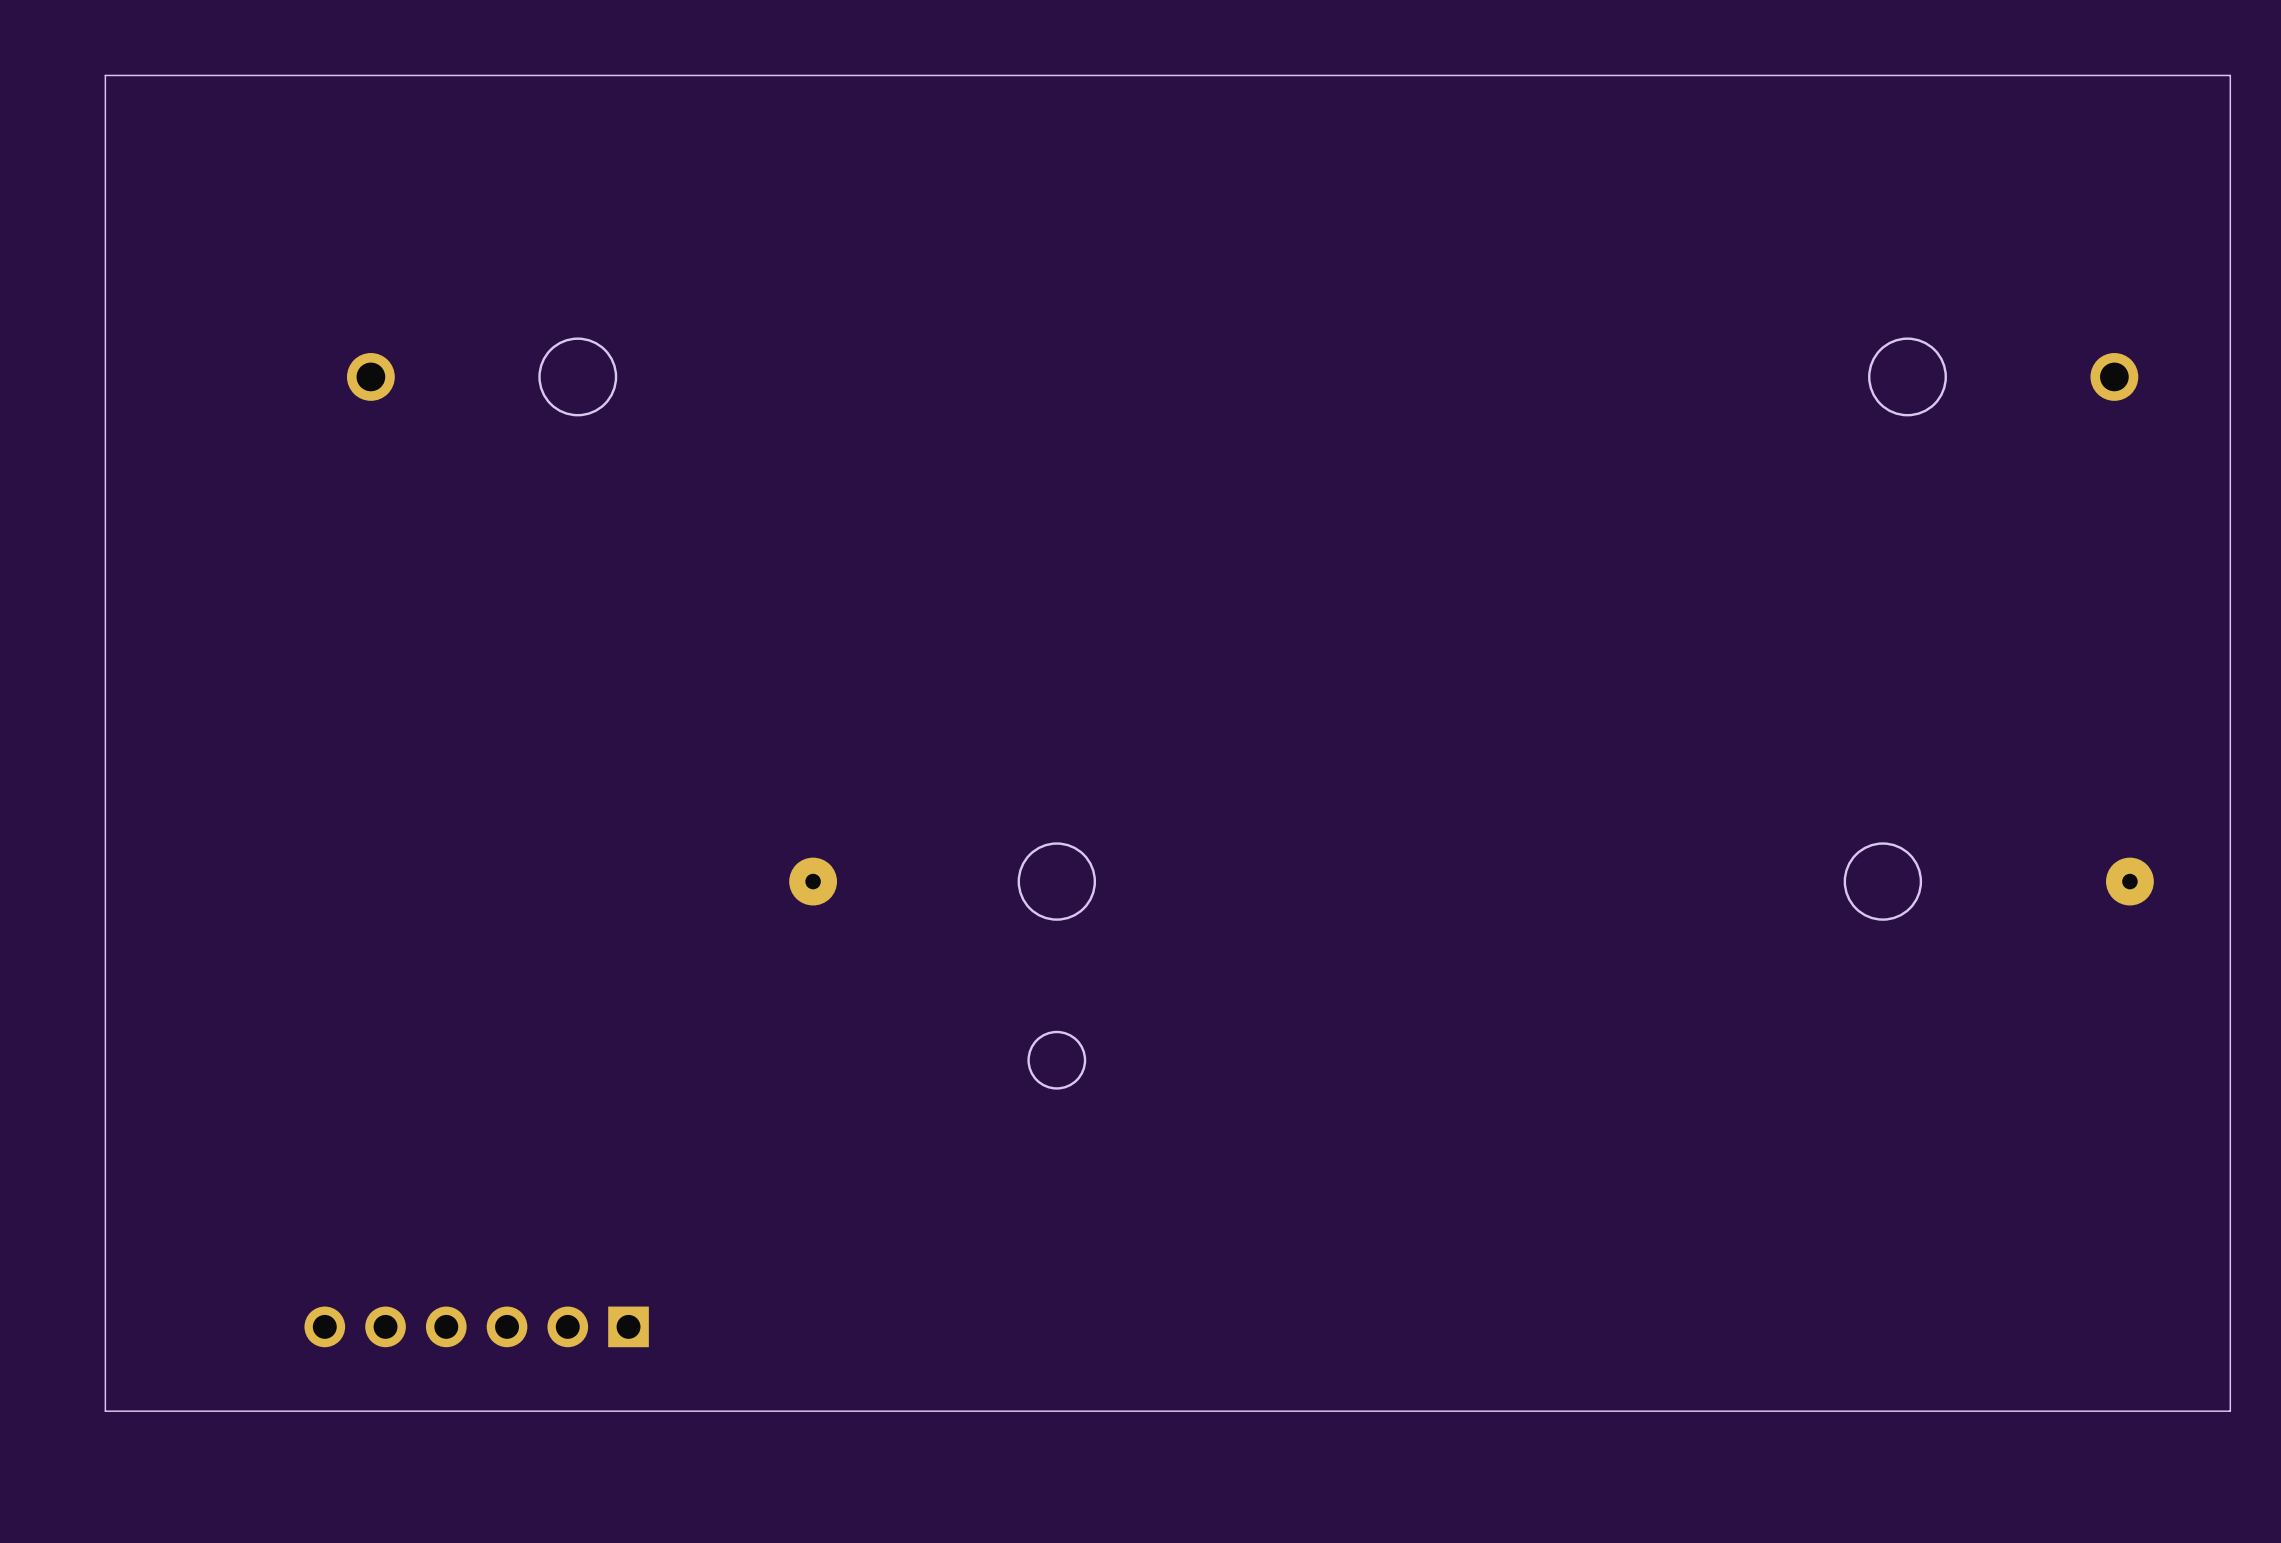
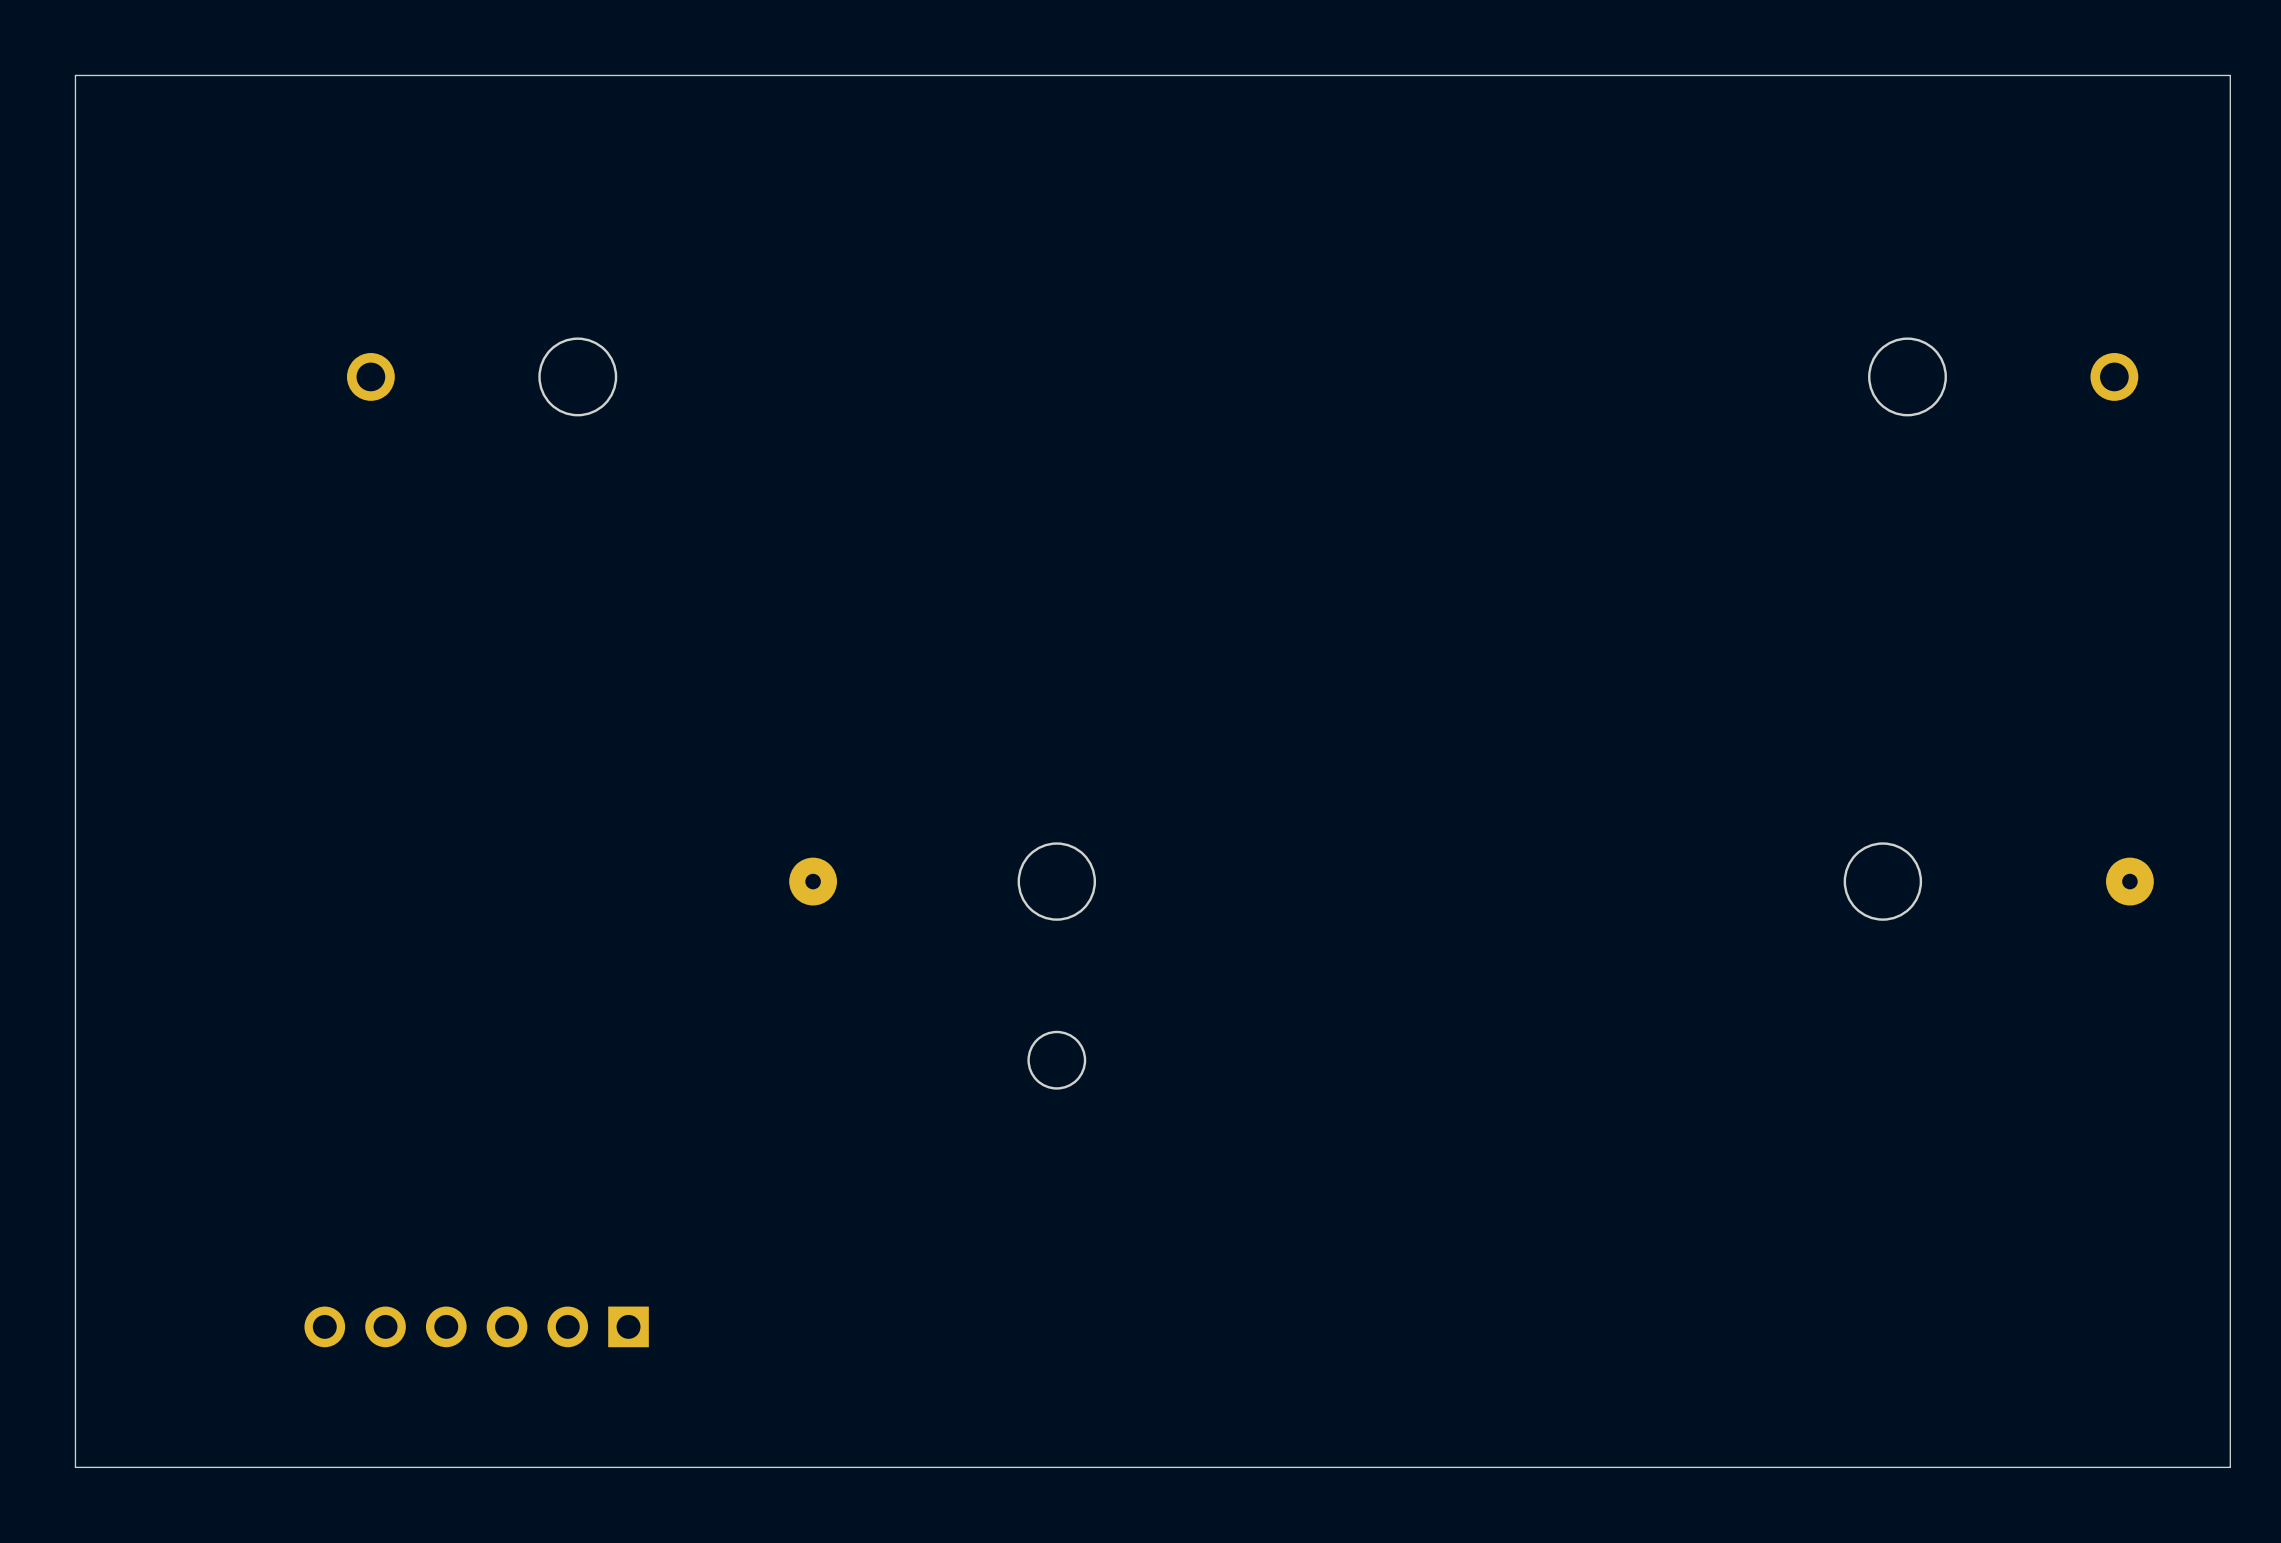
board edge: (105, 75) (105, 1411) (2230, 1411) -> (105, 75) (75, 75) (75, 1467) (2230, 1467) (2230, 1411)

